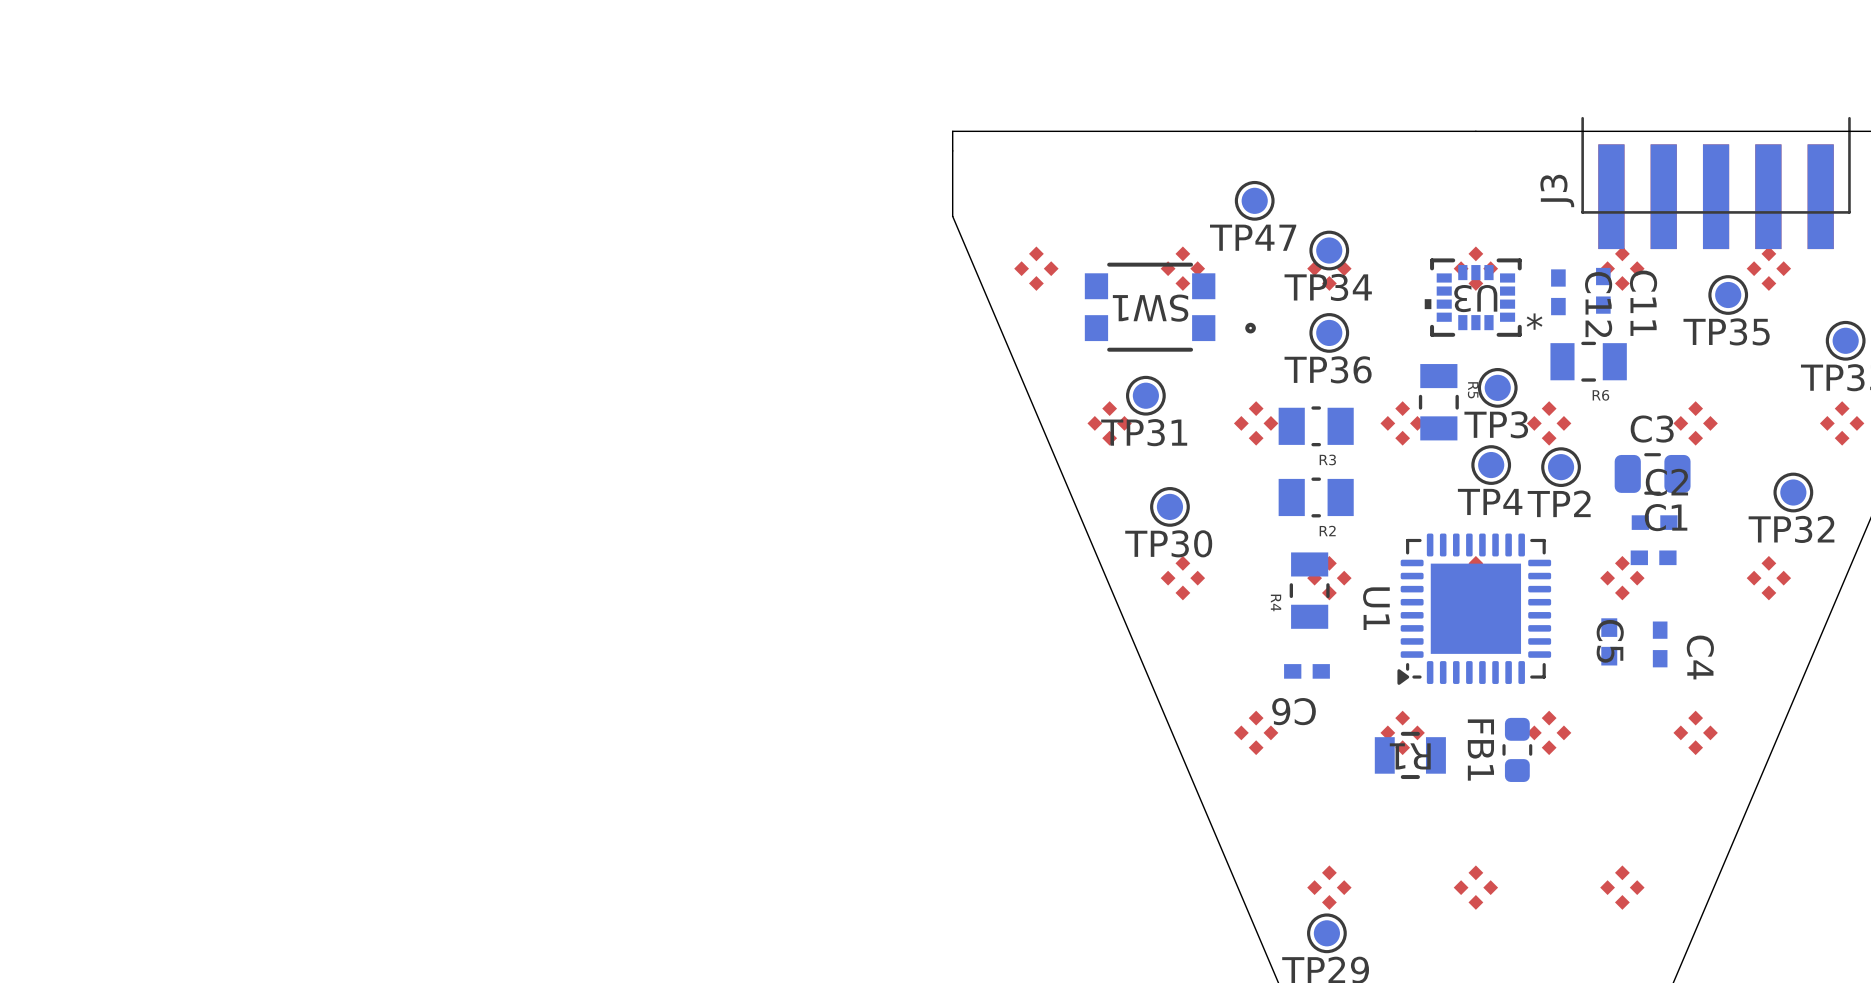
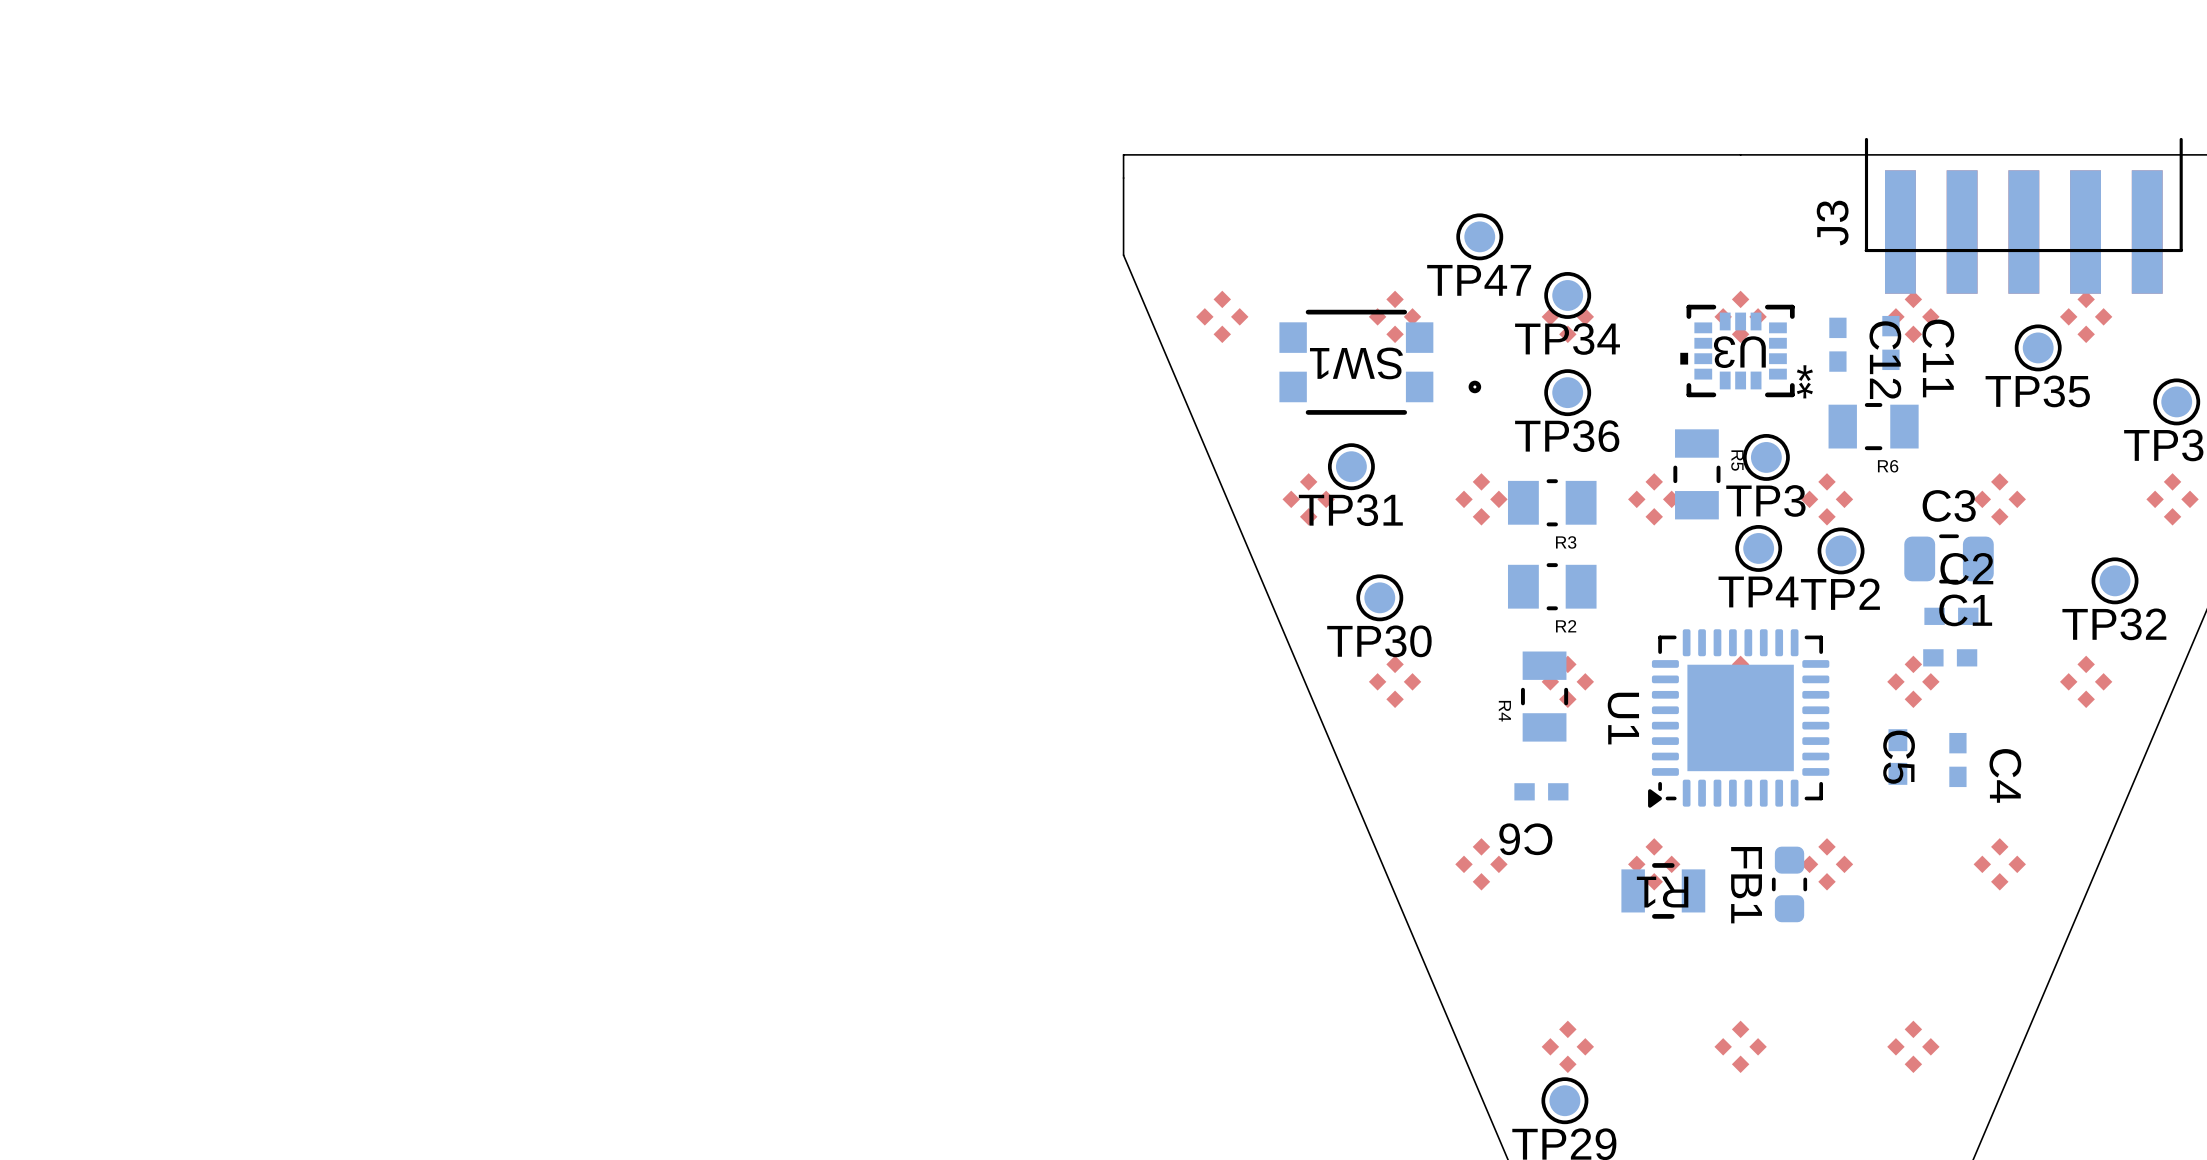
U3 footprint: [1424, 258, 1522, 337] -> [1680, 304, 1795, 398]

